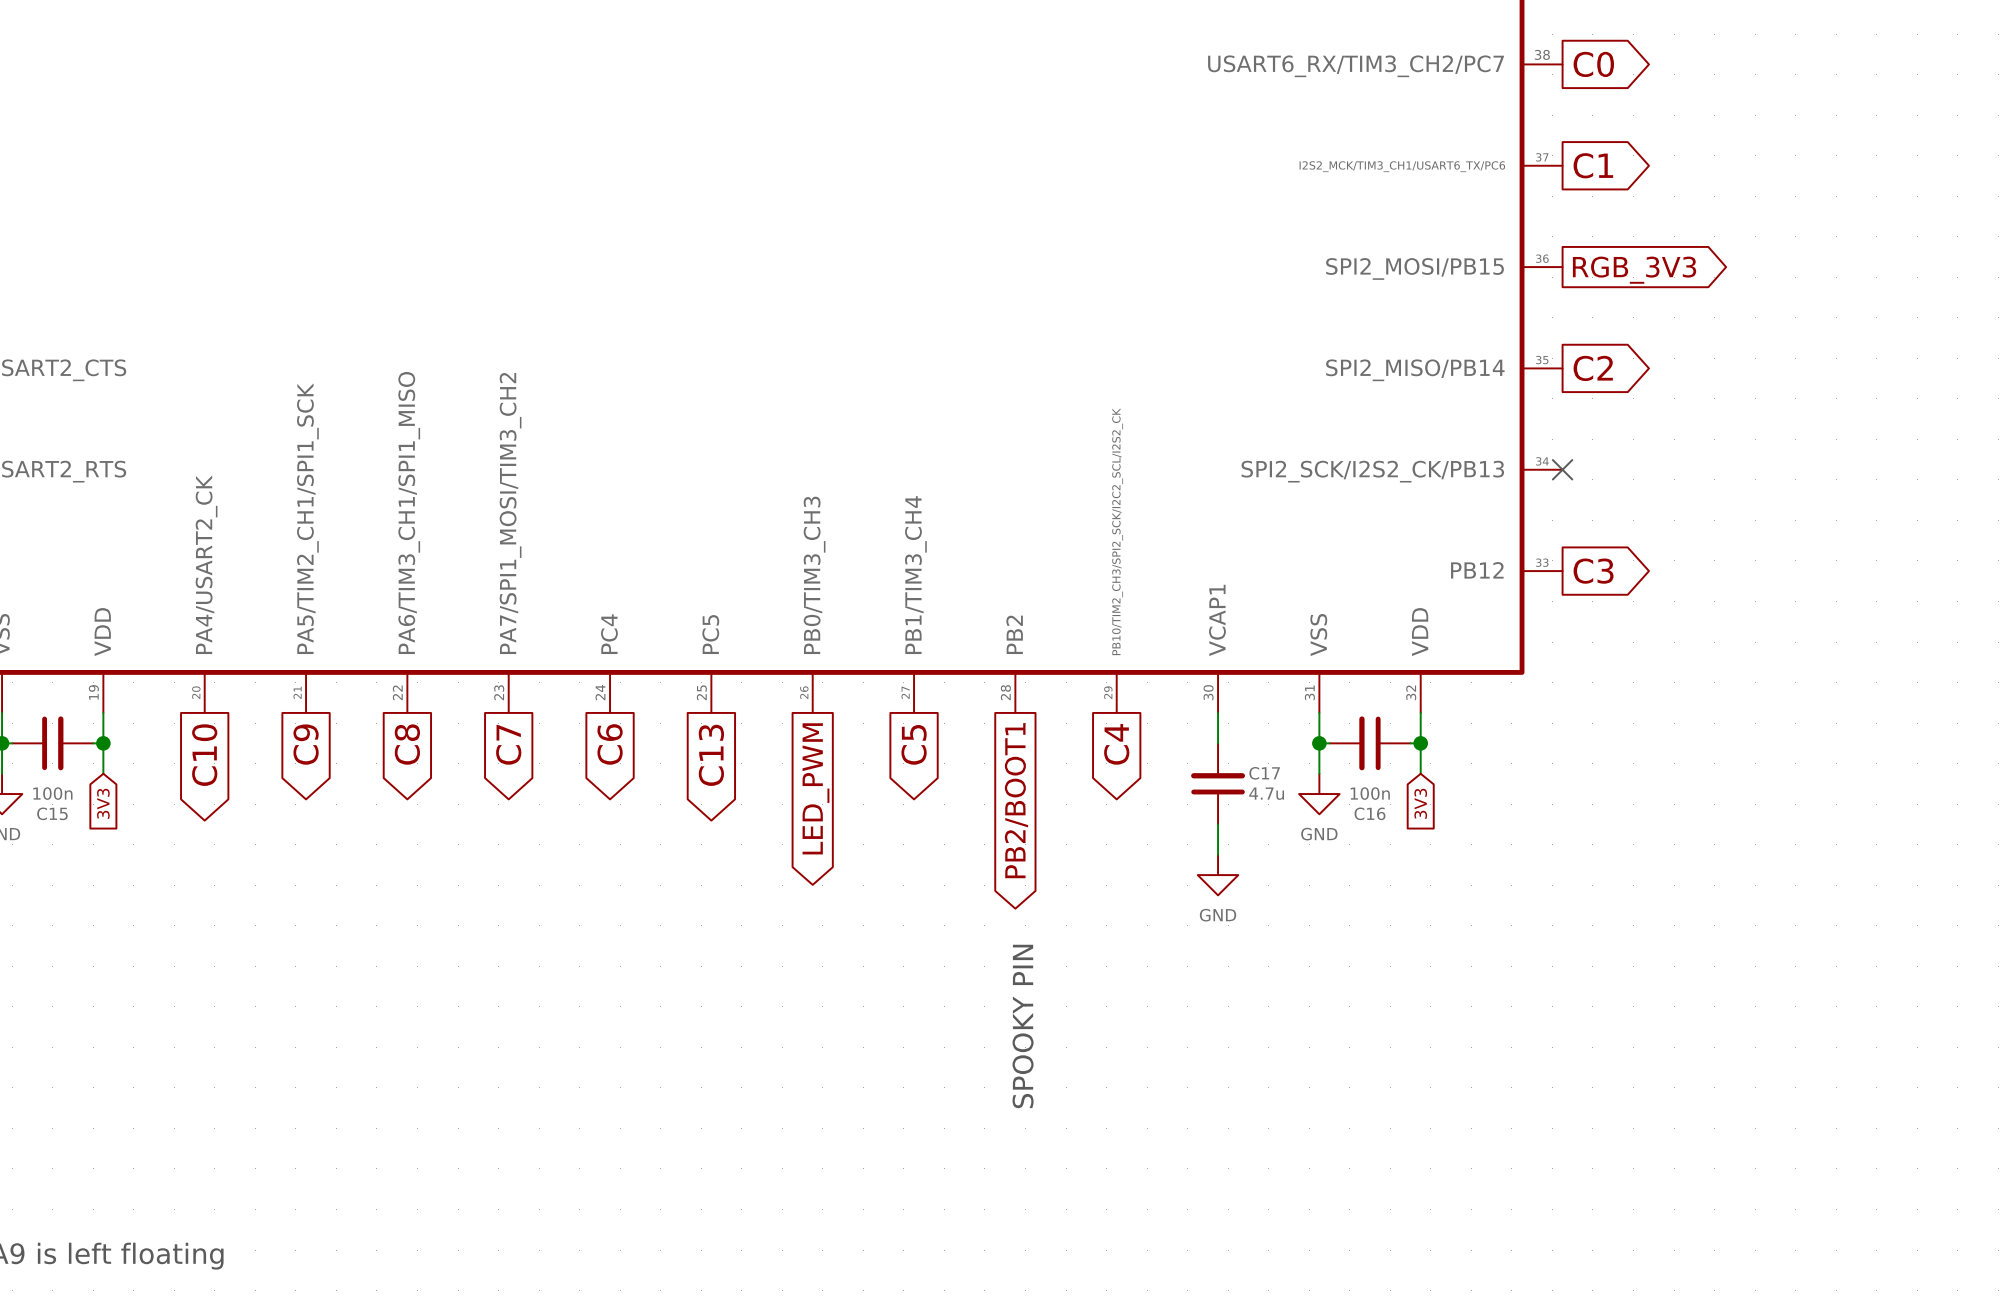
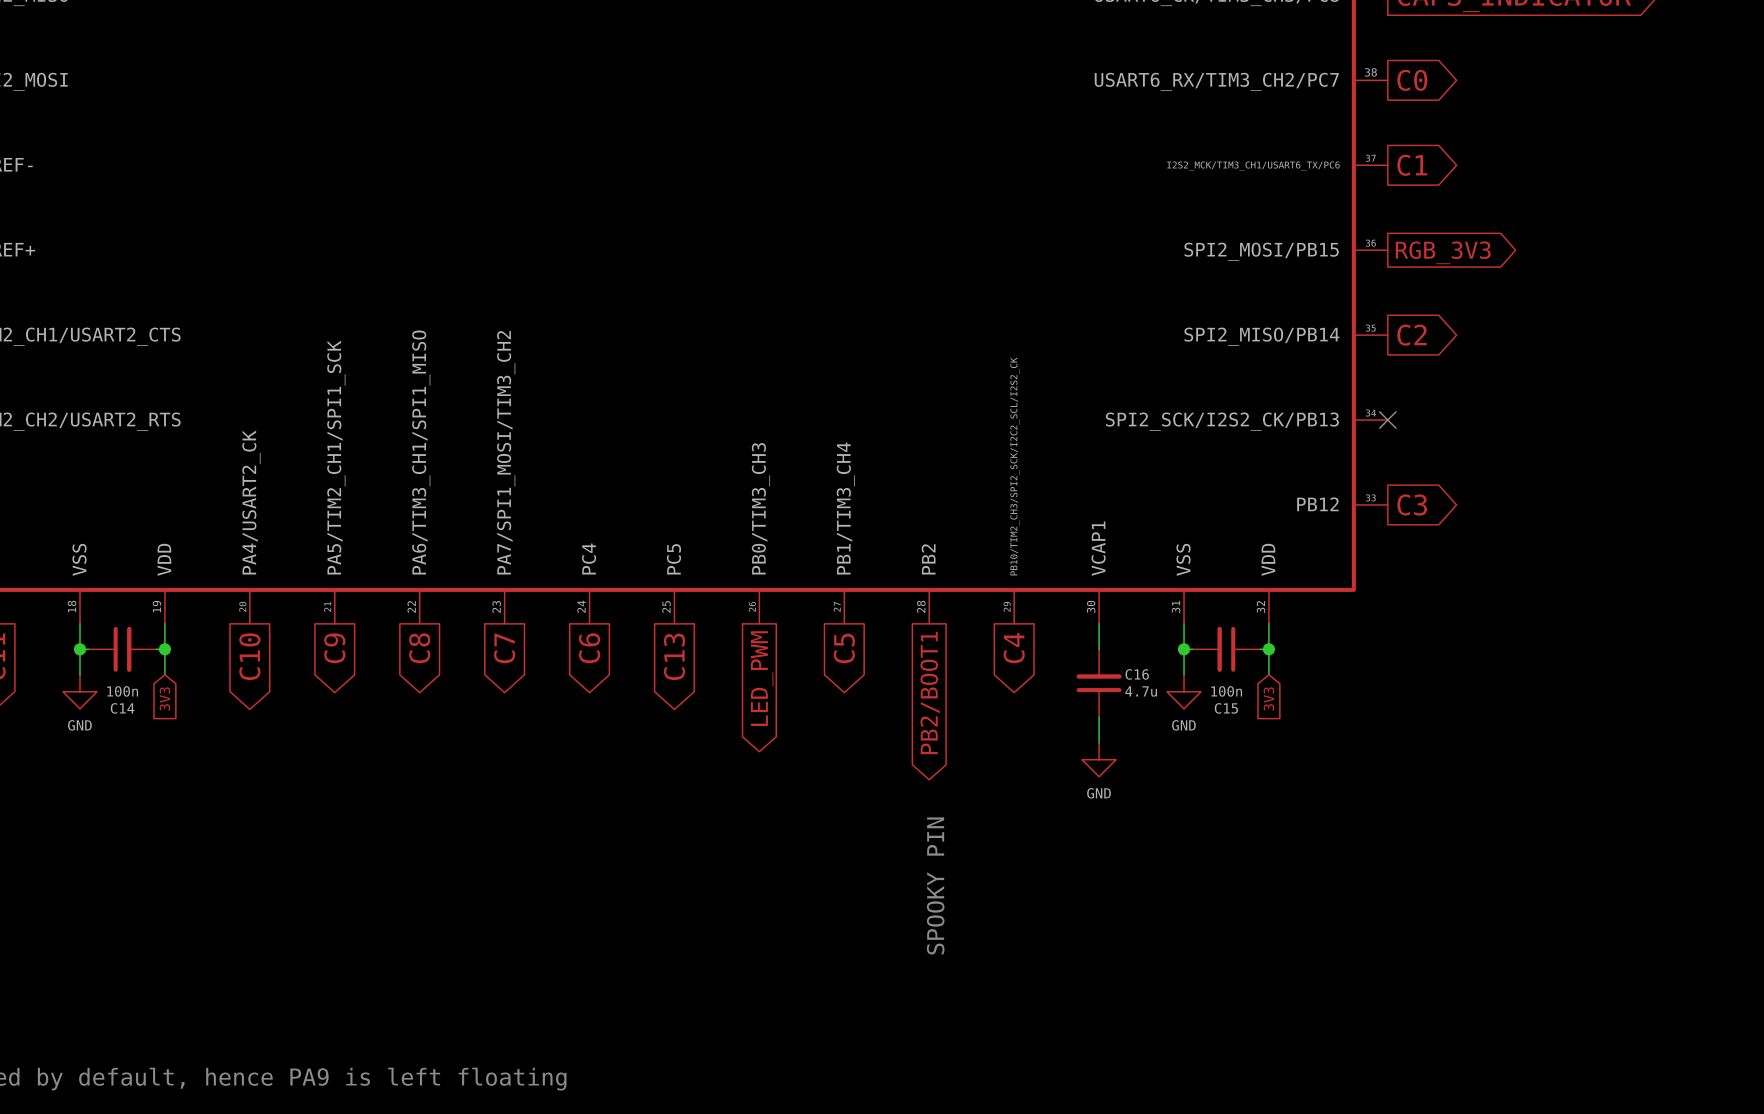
C17 name: C17 (1264, 773) -> C16 (1137, 674)
C15 name: C15 (52, 813) -> C14 (122, 708)
C16 name: C16 (1369, 813) -> C15 (1226, 708)

